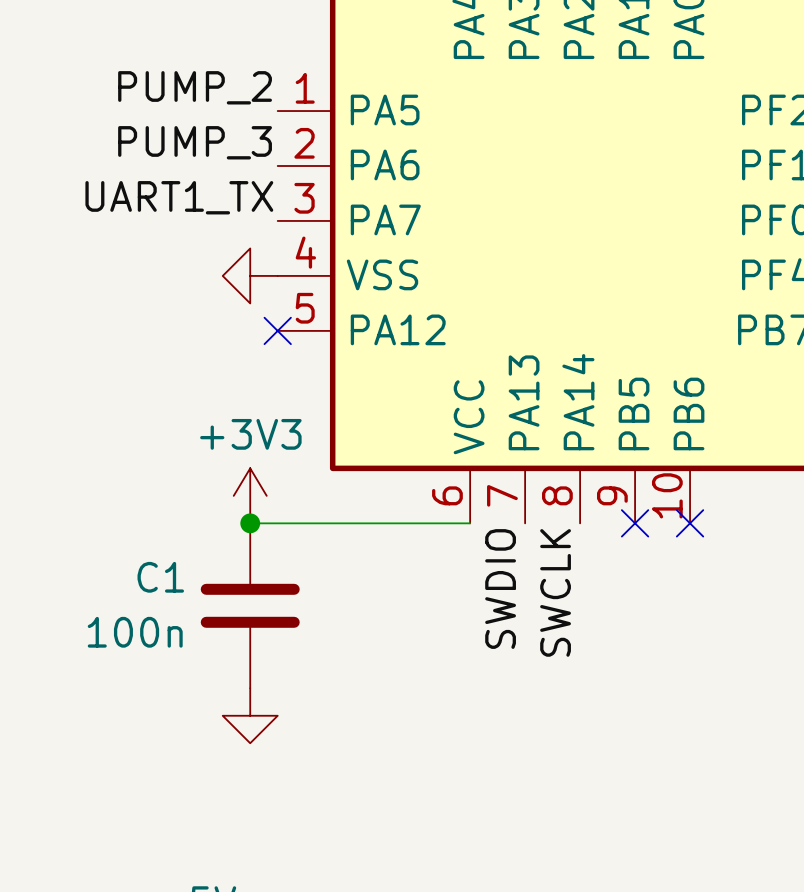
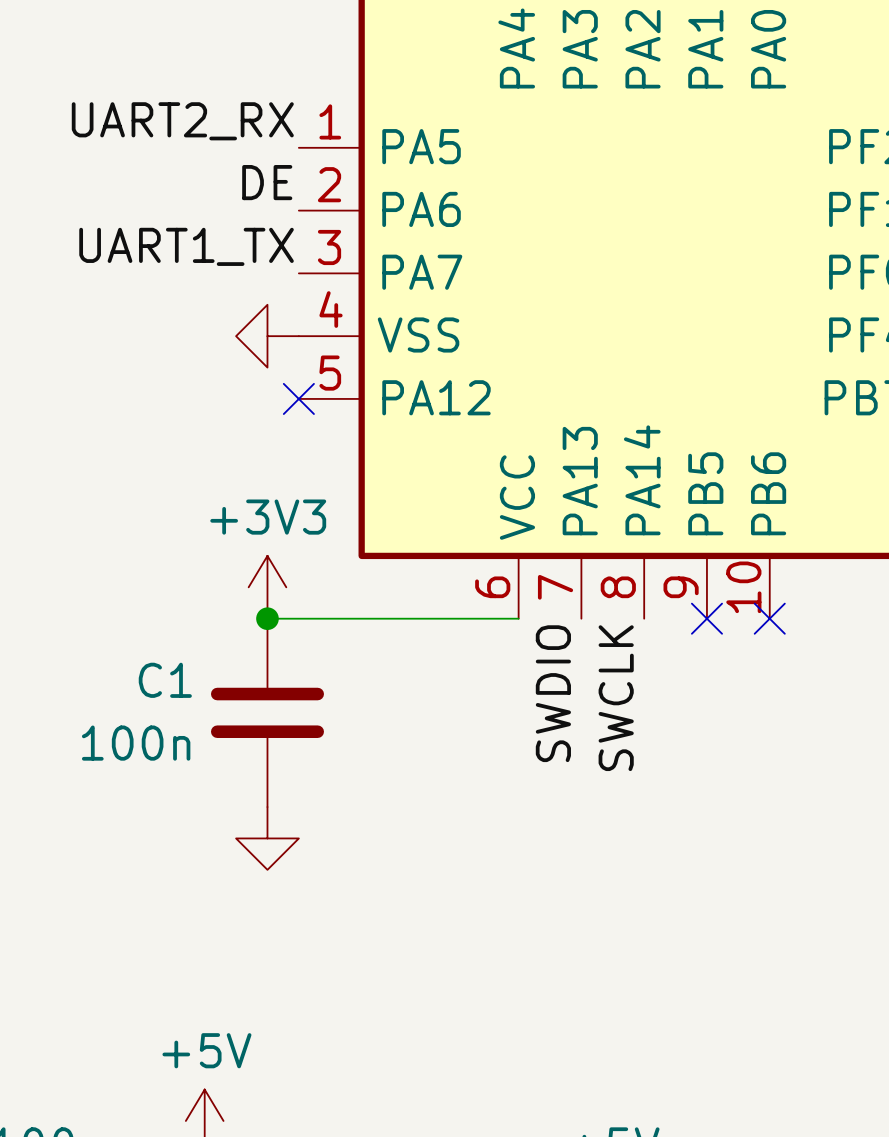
label: PUMP_2 (195, 87) -> UART2_RX (182, 121)
label: PUMP_3 (195, 142) -> DE (267, 182)

